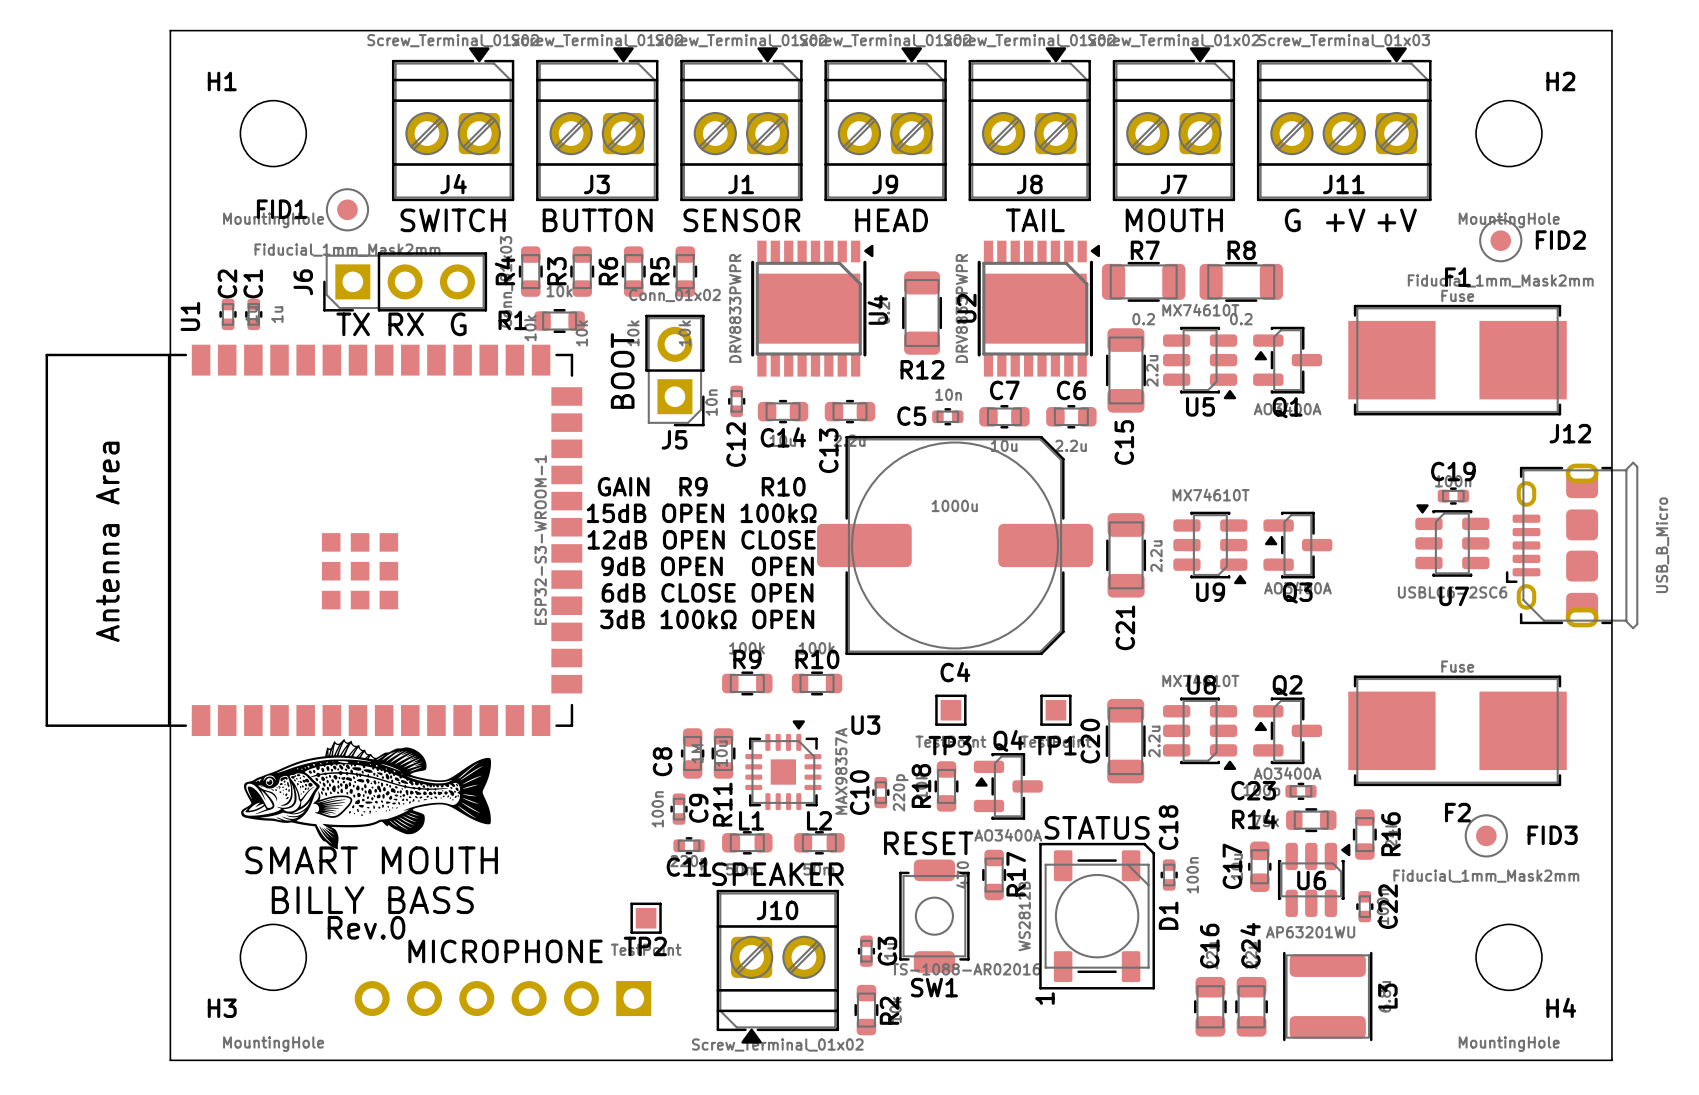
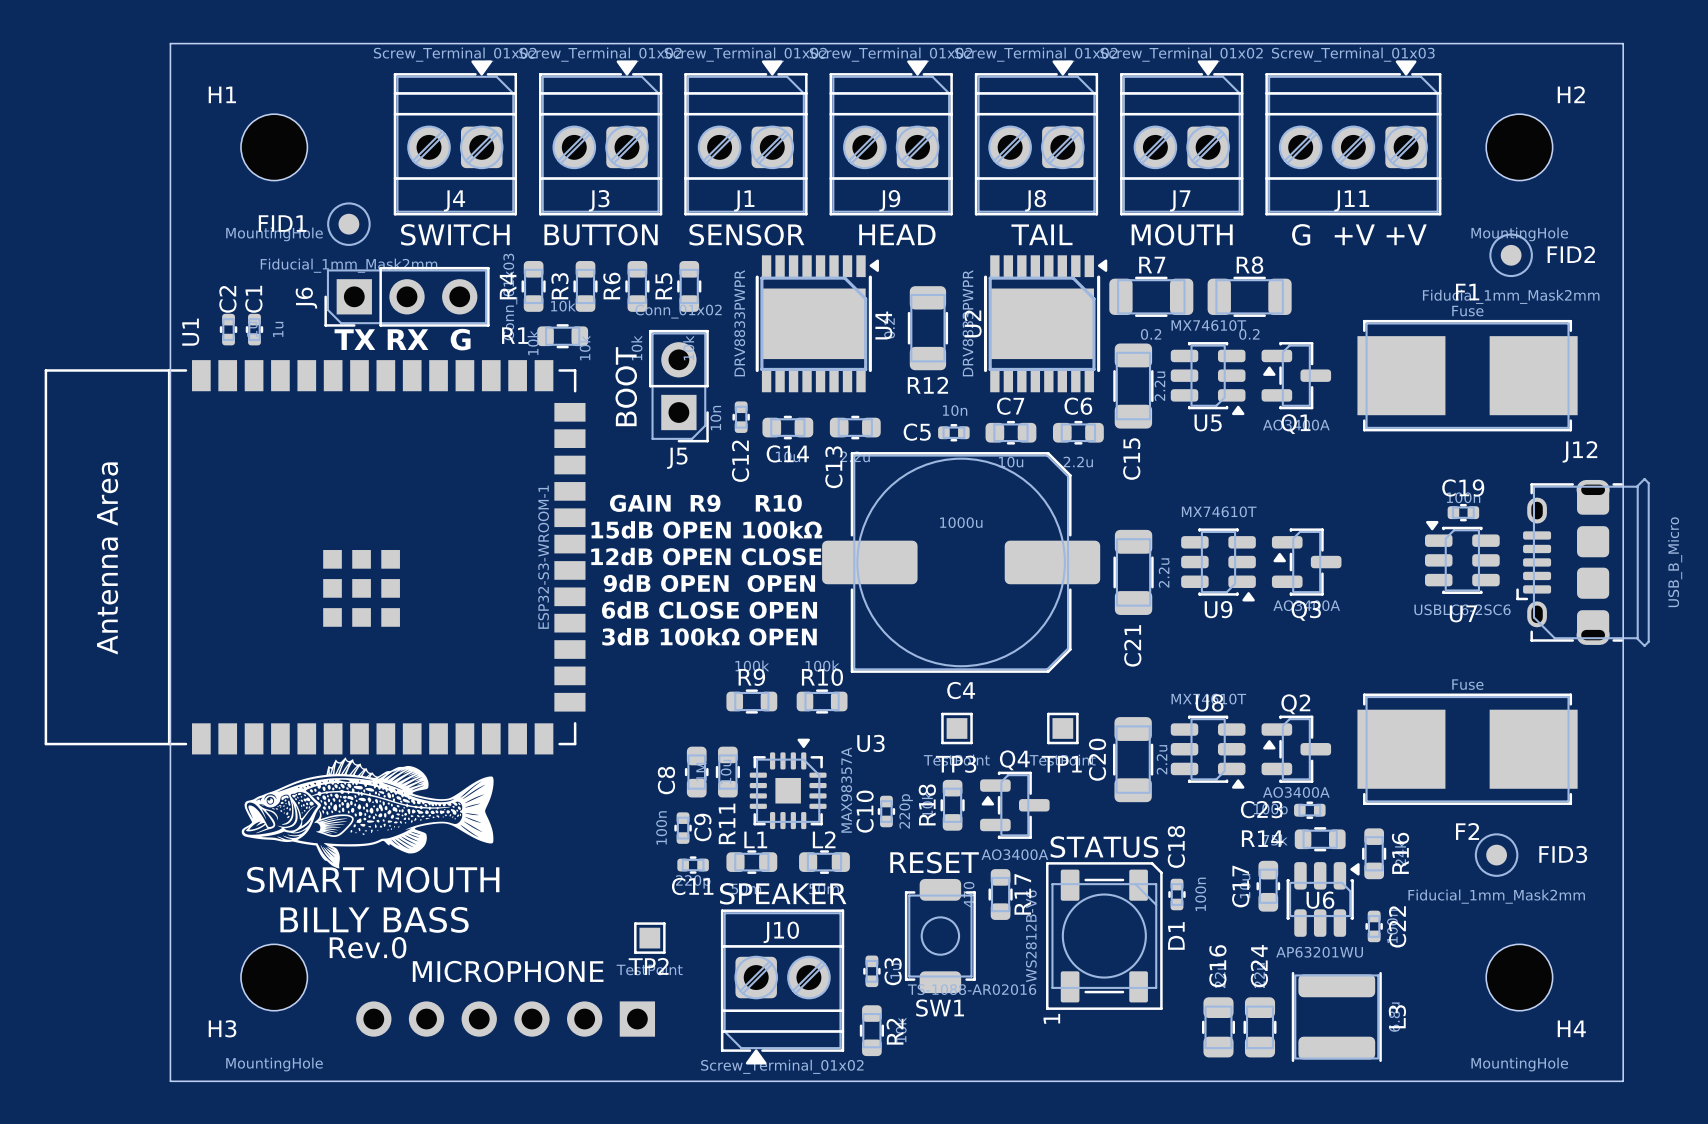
D1 value: WS2812B (1024, 916) -> WS2812B-V6 (1031, 936)

